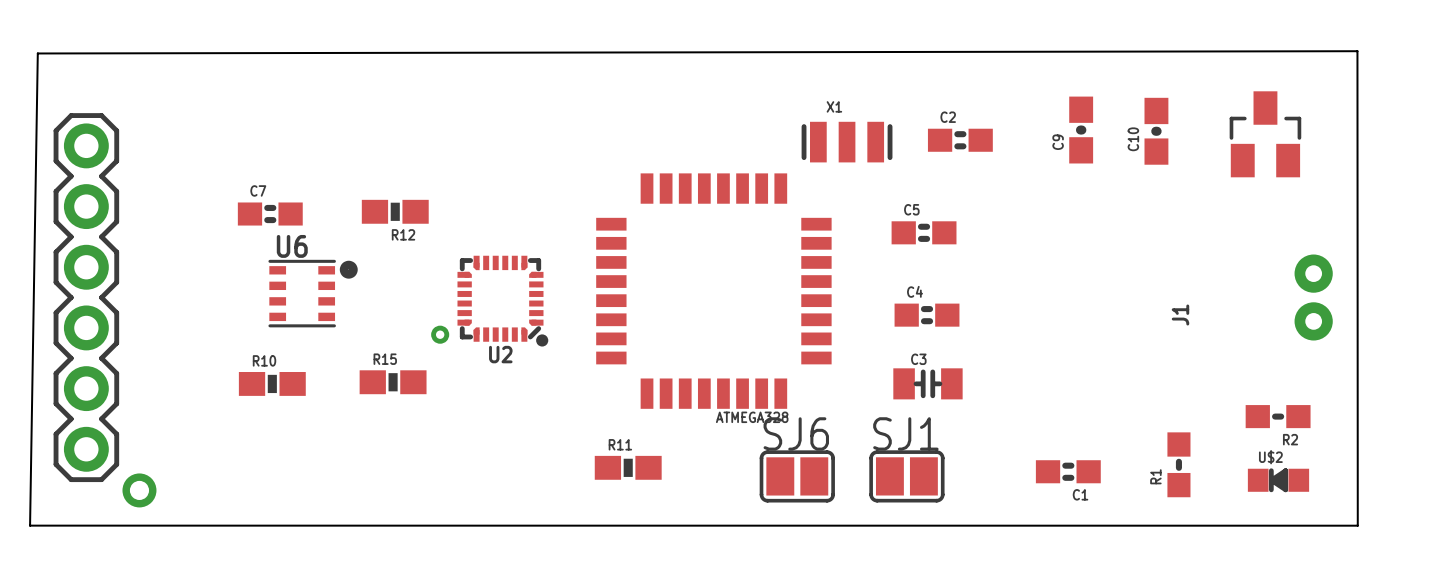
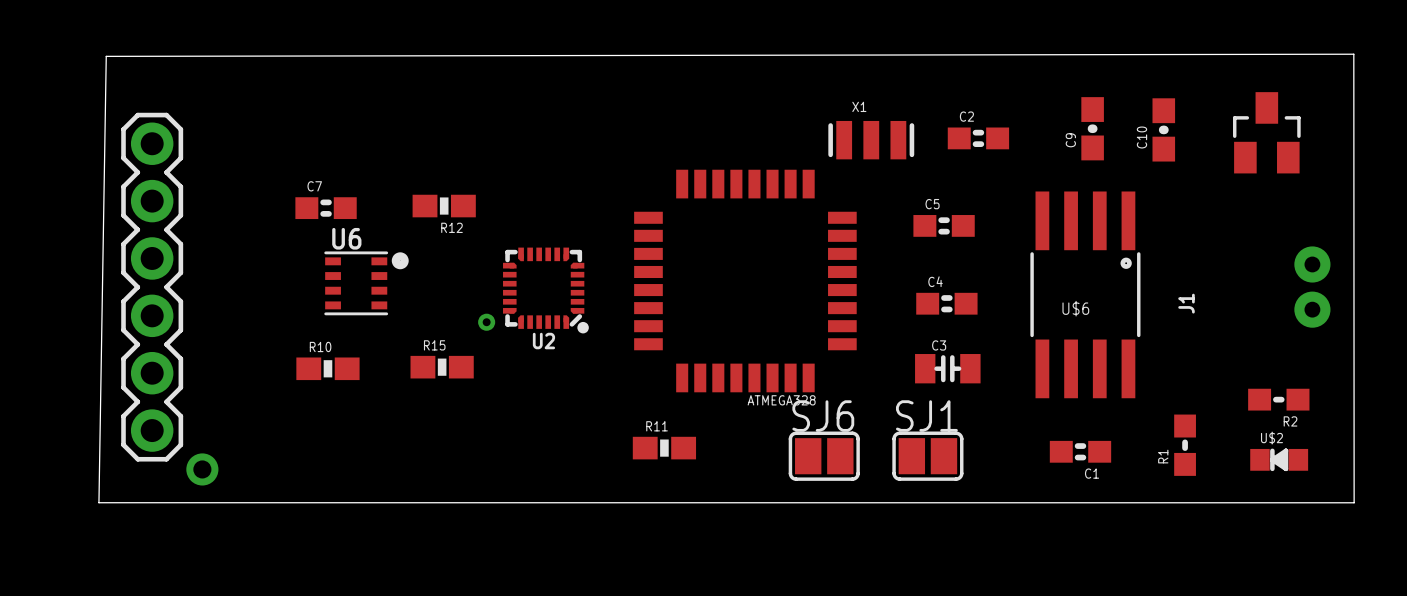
U$6: none -> (1085, 294)

